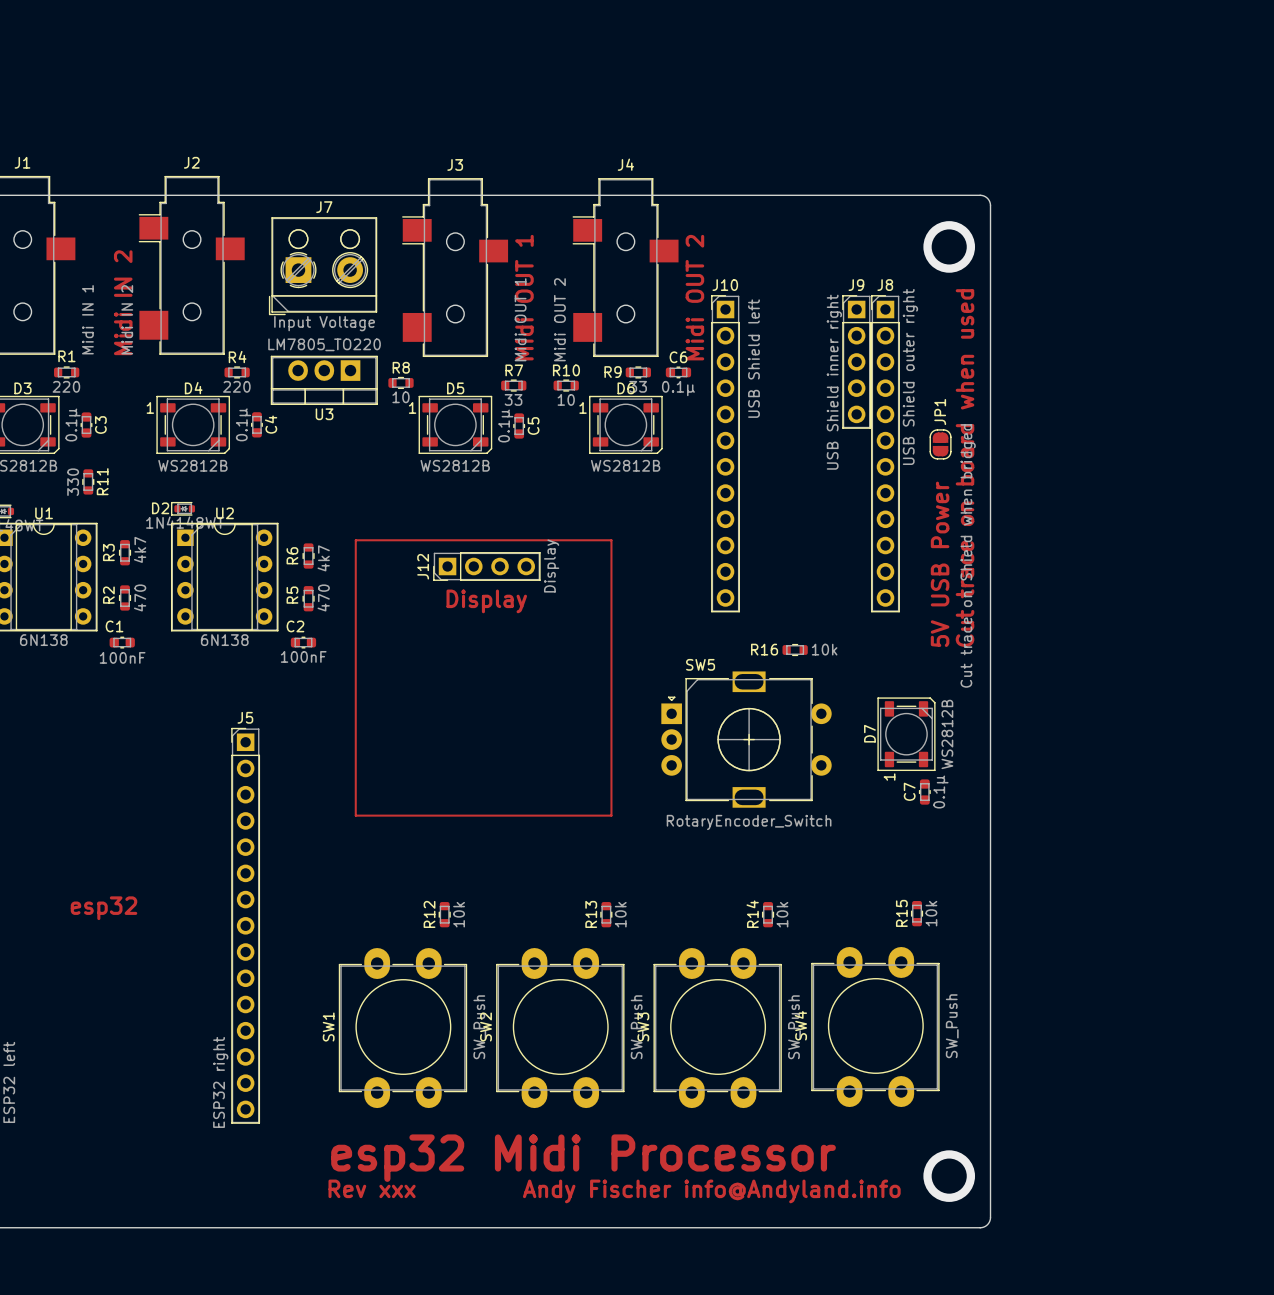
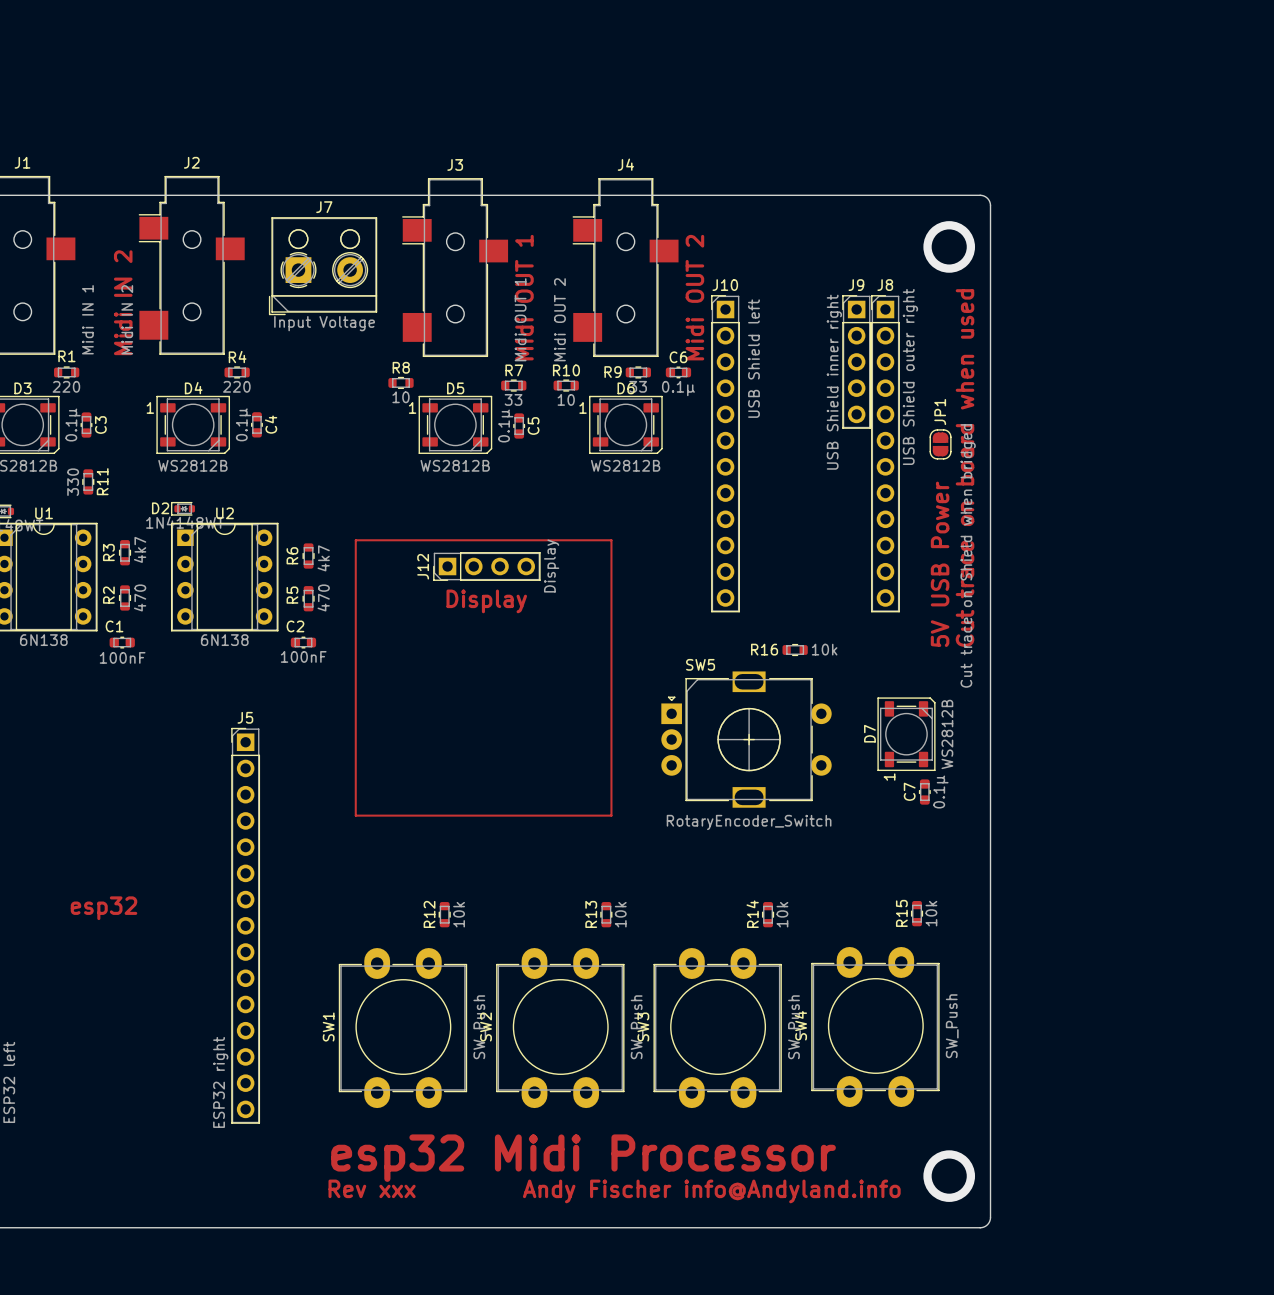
U3: LM7805_TO220 (324, 380) -> none

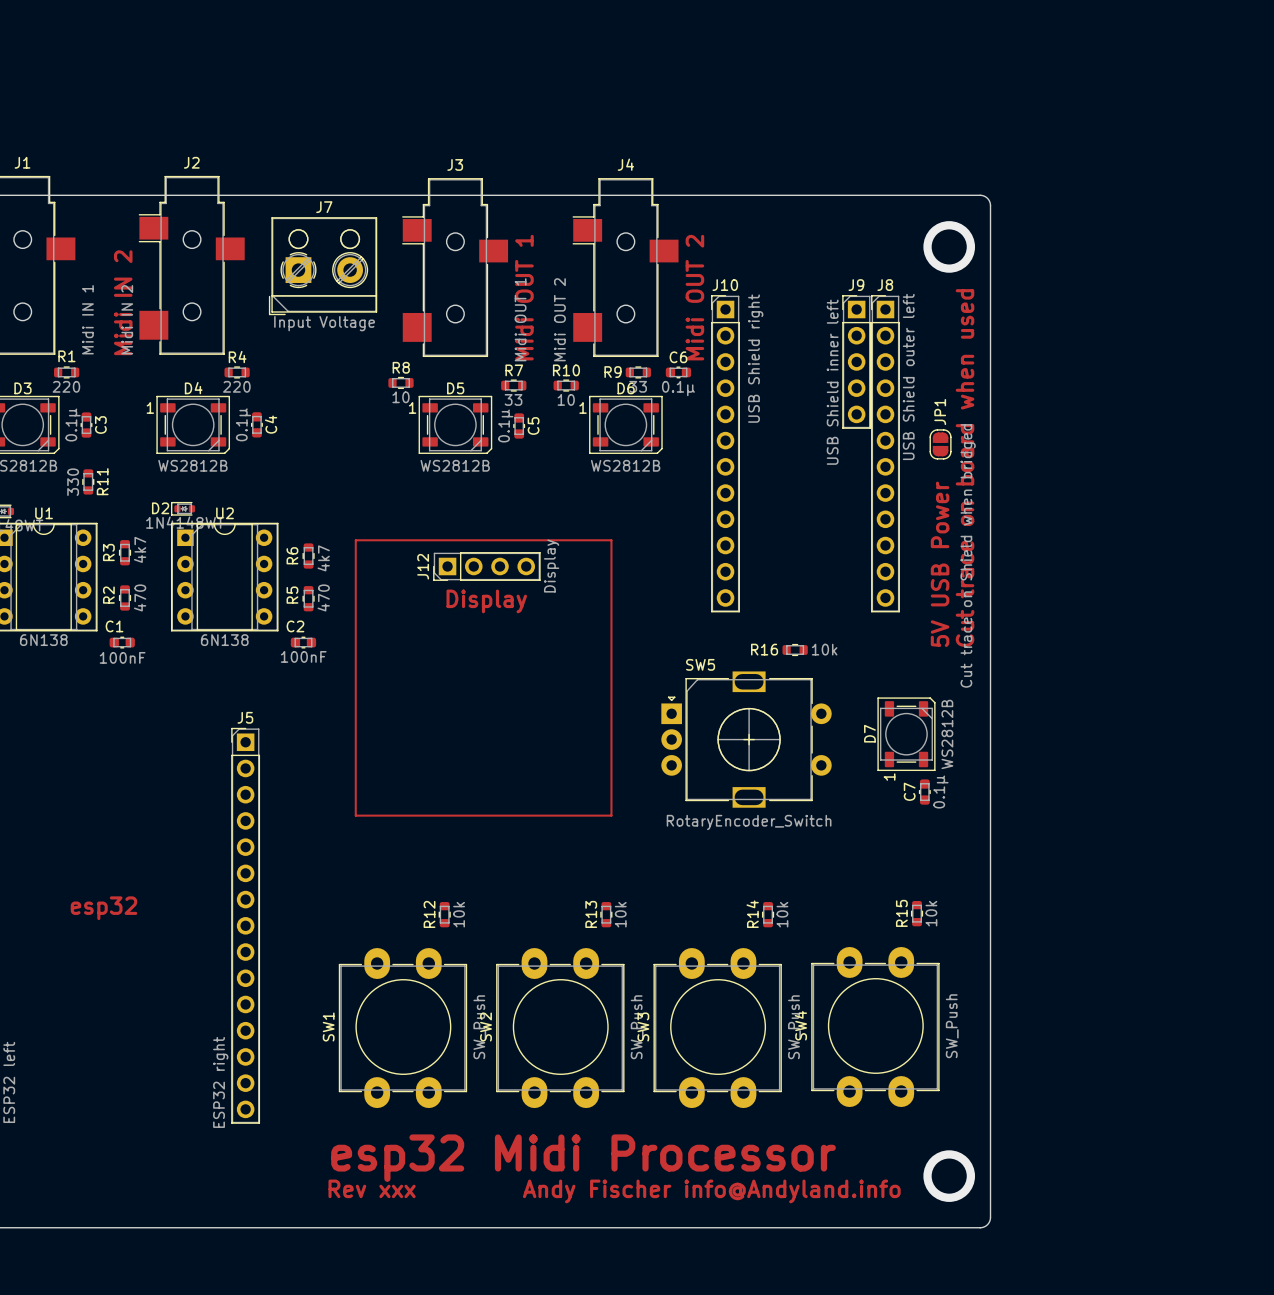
J10 value: USB Shield left (753, 358) -> USB Shield right (755, 358)
J8 value: USB Shield outer right (910, 376) -> USB Shield outer left (908, 376)
J9 value: USB Shield inner right (834, 382) -> USB Shield inner left (832, 382)

